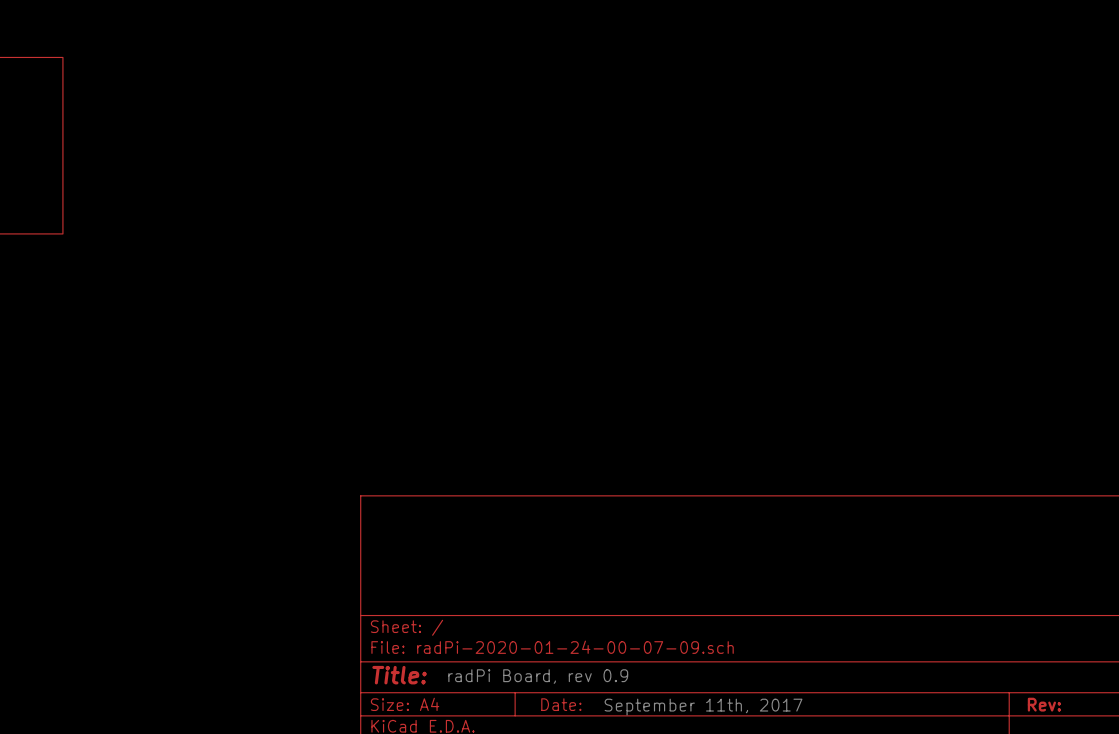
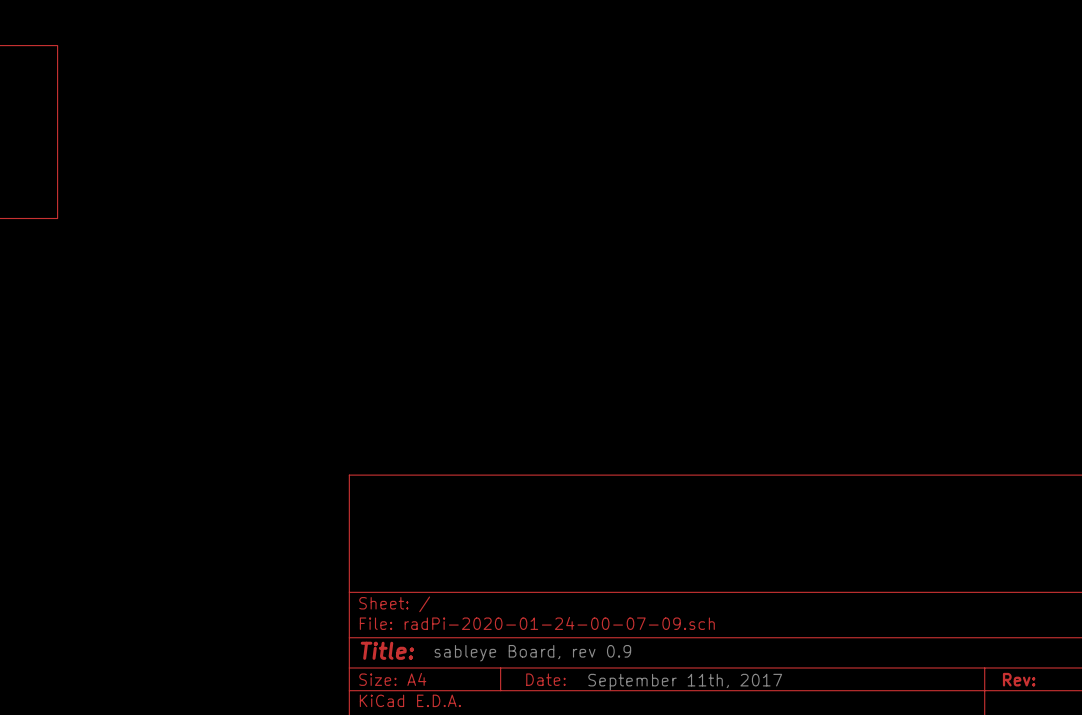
text: radPi Board, rev 0.9 (538, 676) -> sableye Board, rev 0.9 (532, 653)

